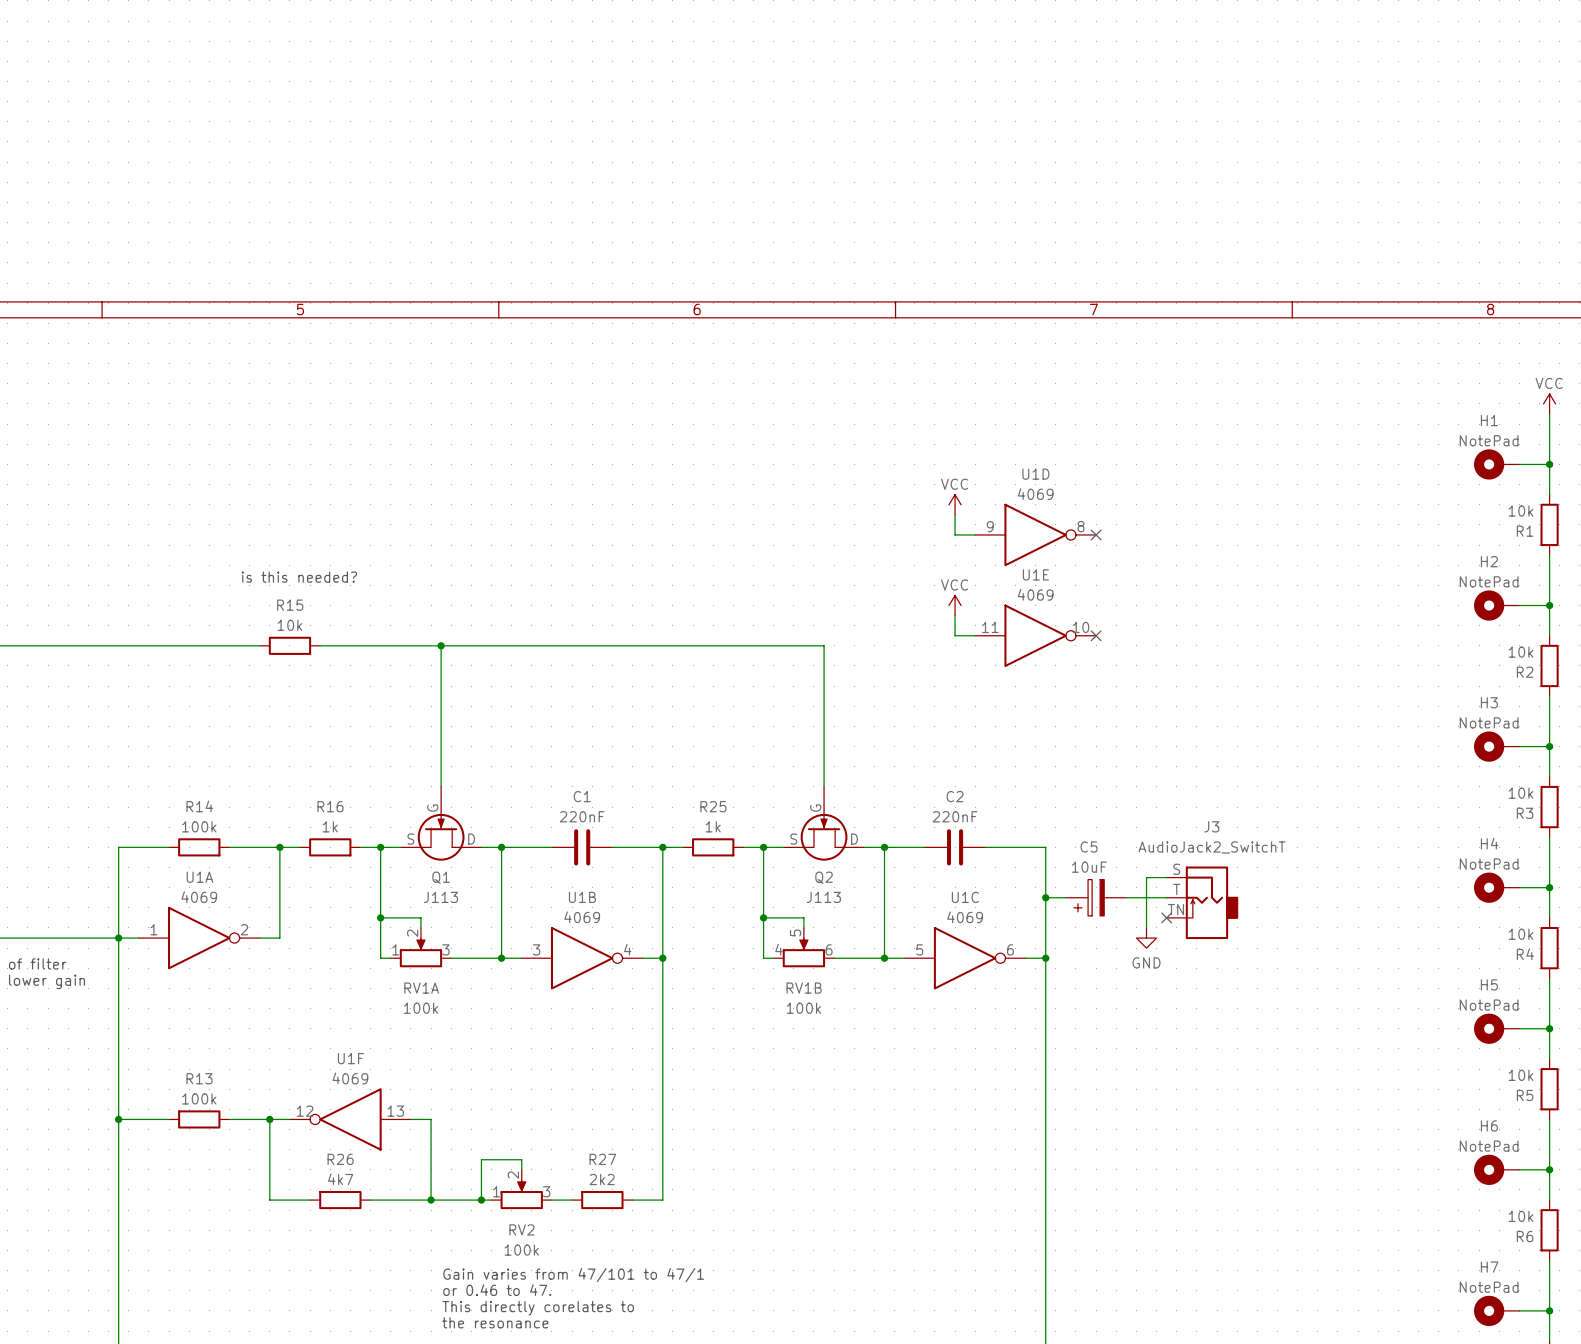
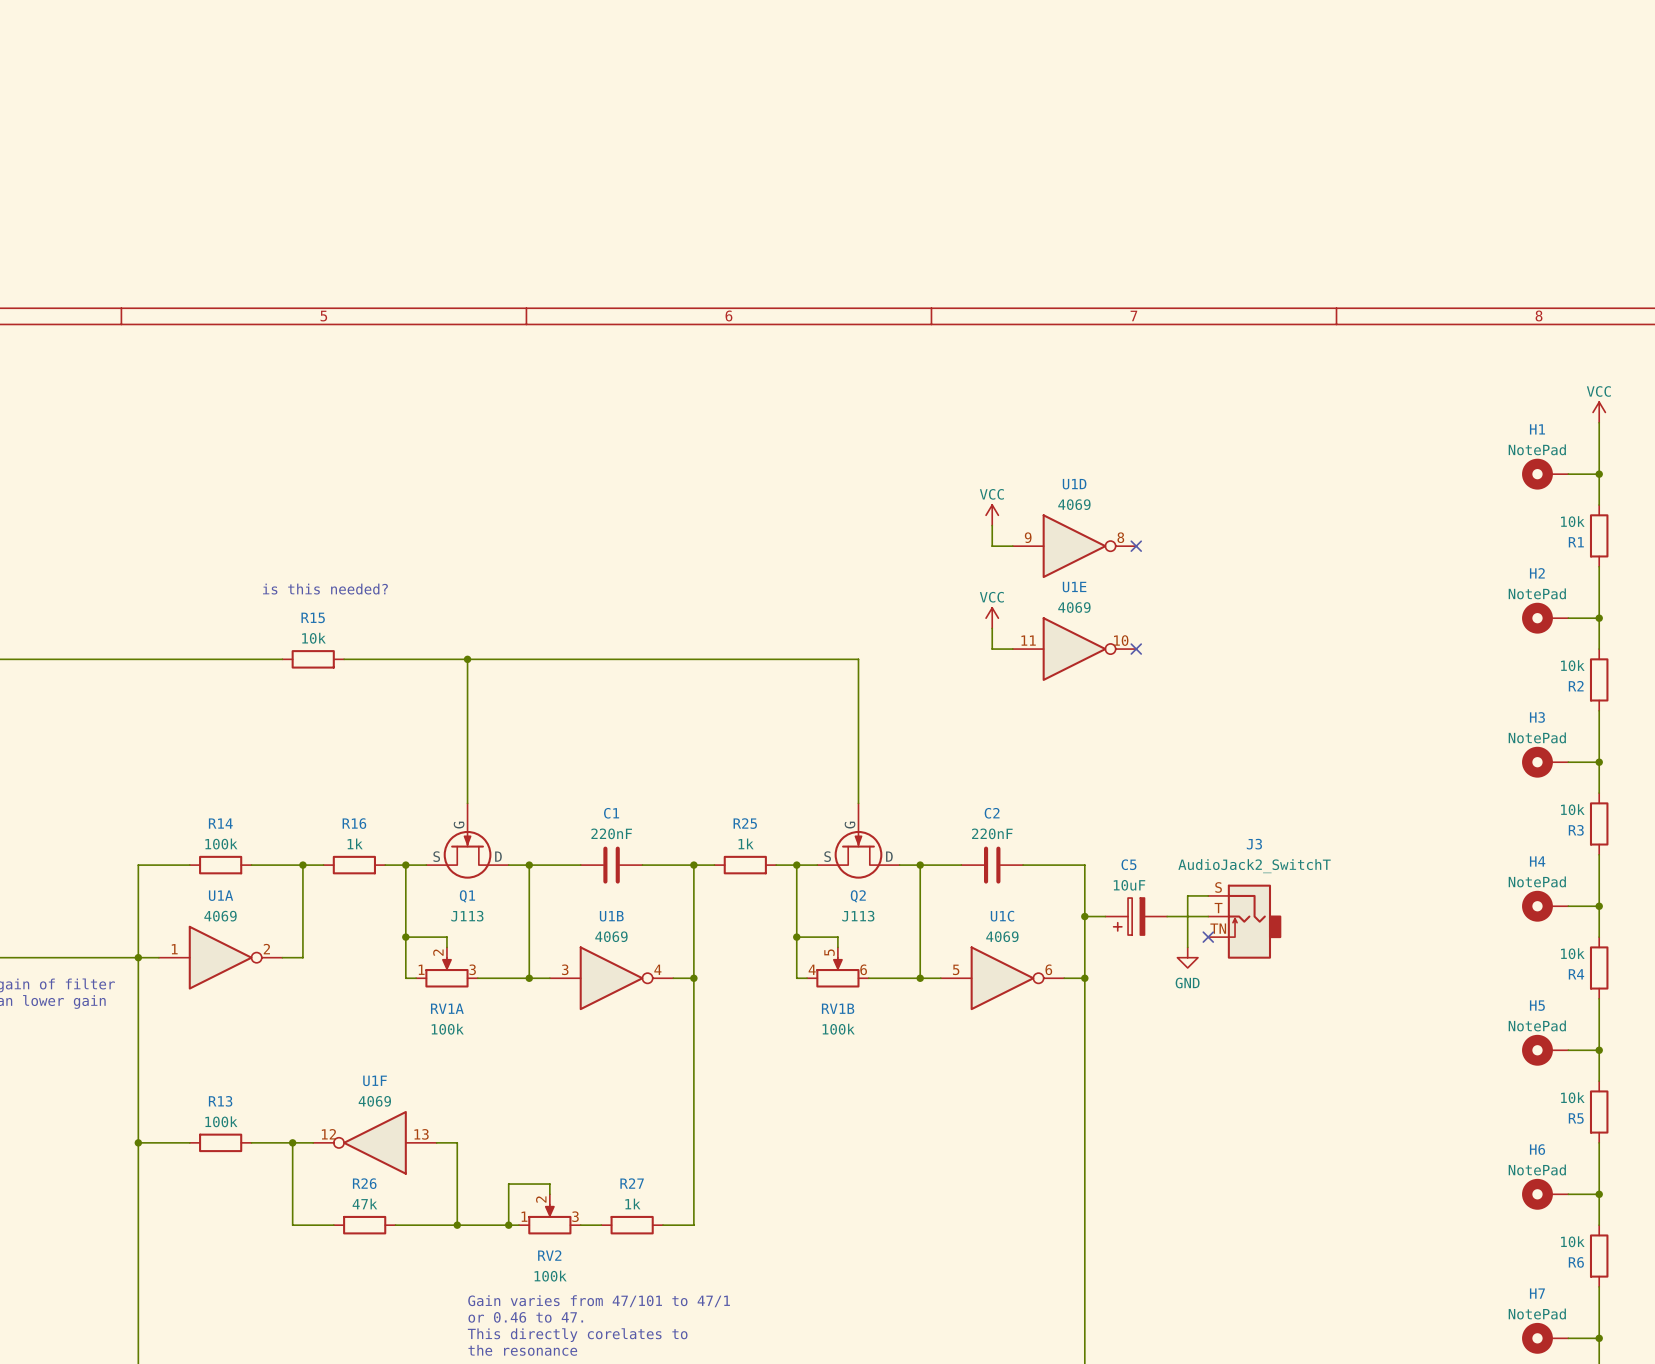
R26 value: 4k7 (340, 1179) -> 47k (364, 1203)
R27 value: 2k2 (602, 1179) -> 1k (632, 1203)

